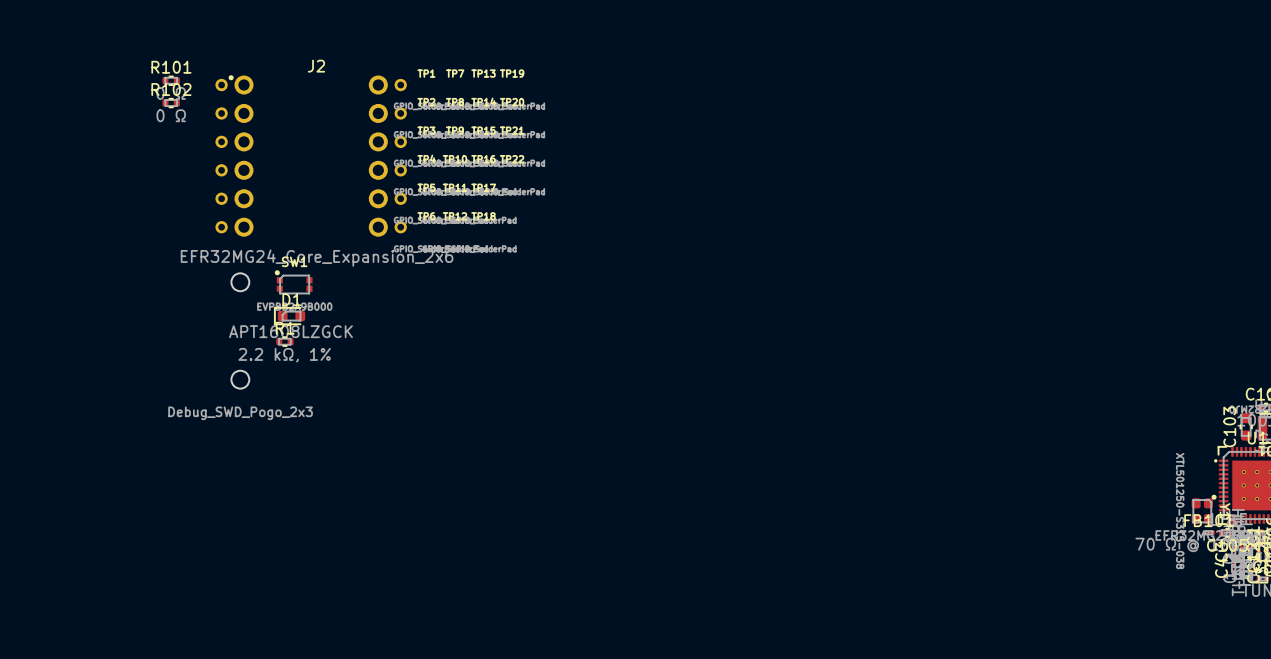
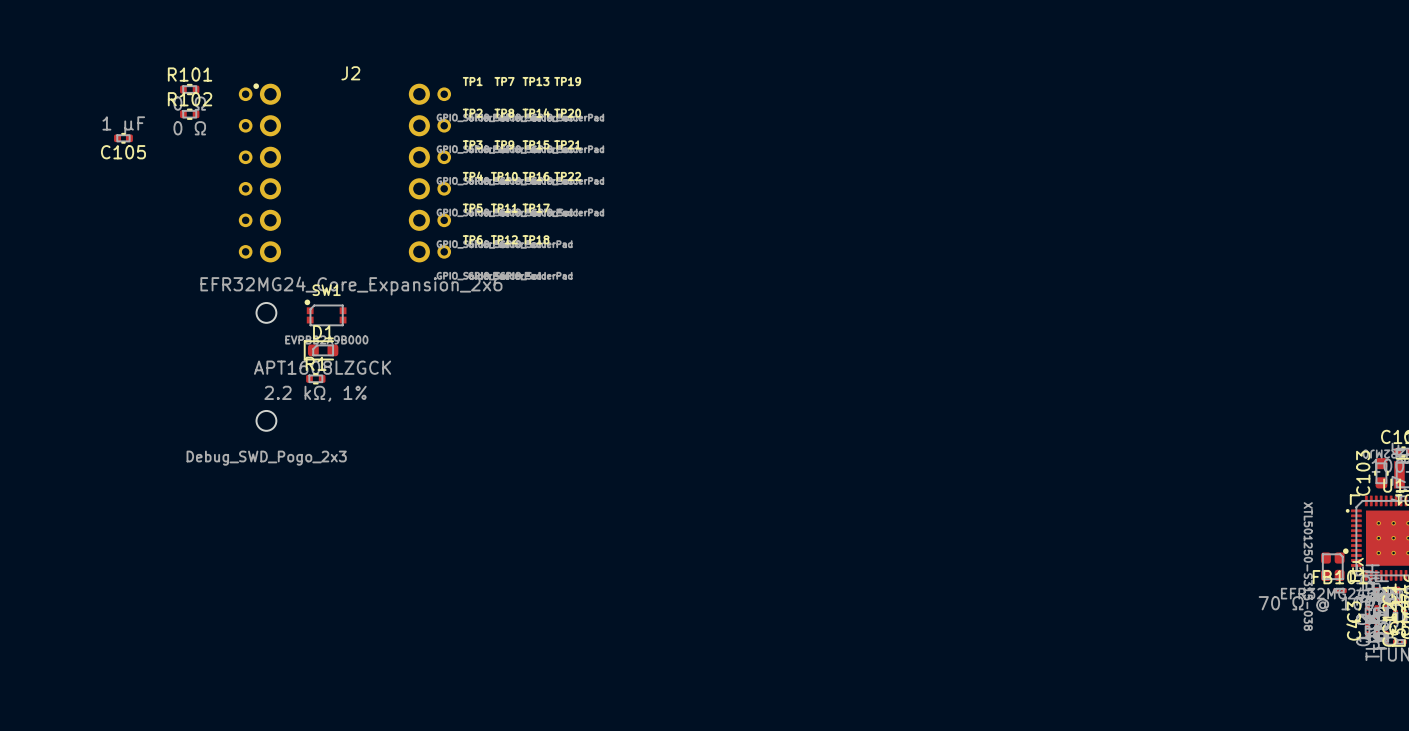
C105 position: (1227, 532) -> (123, 138)

